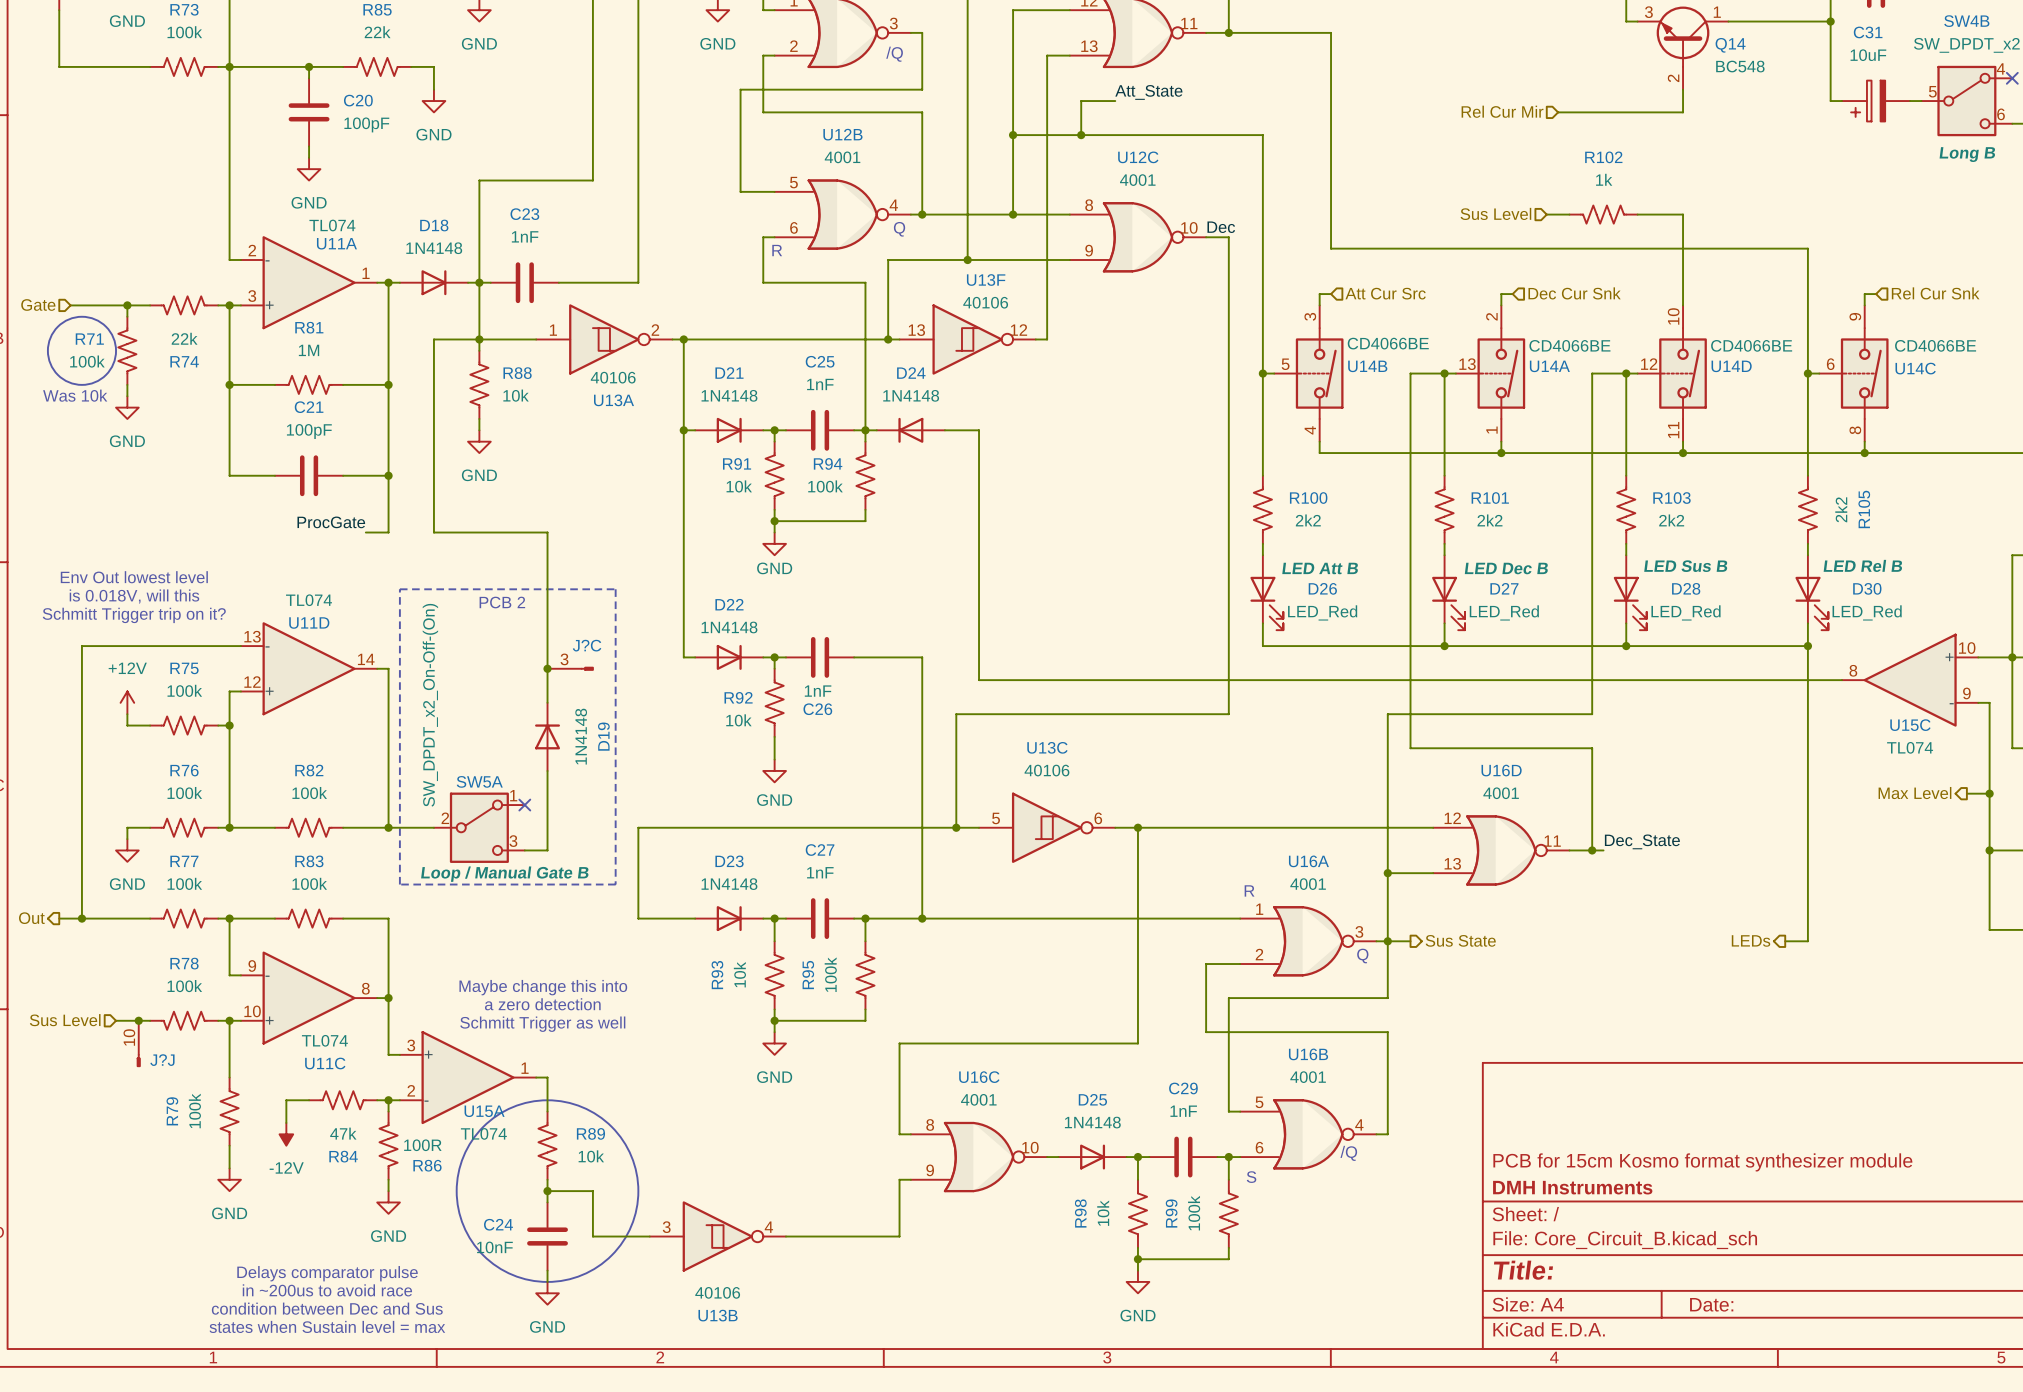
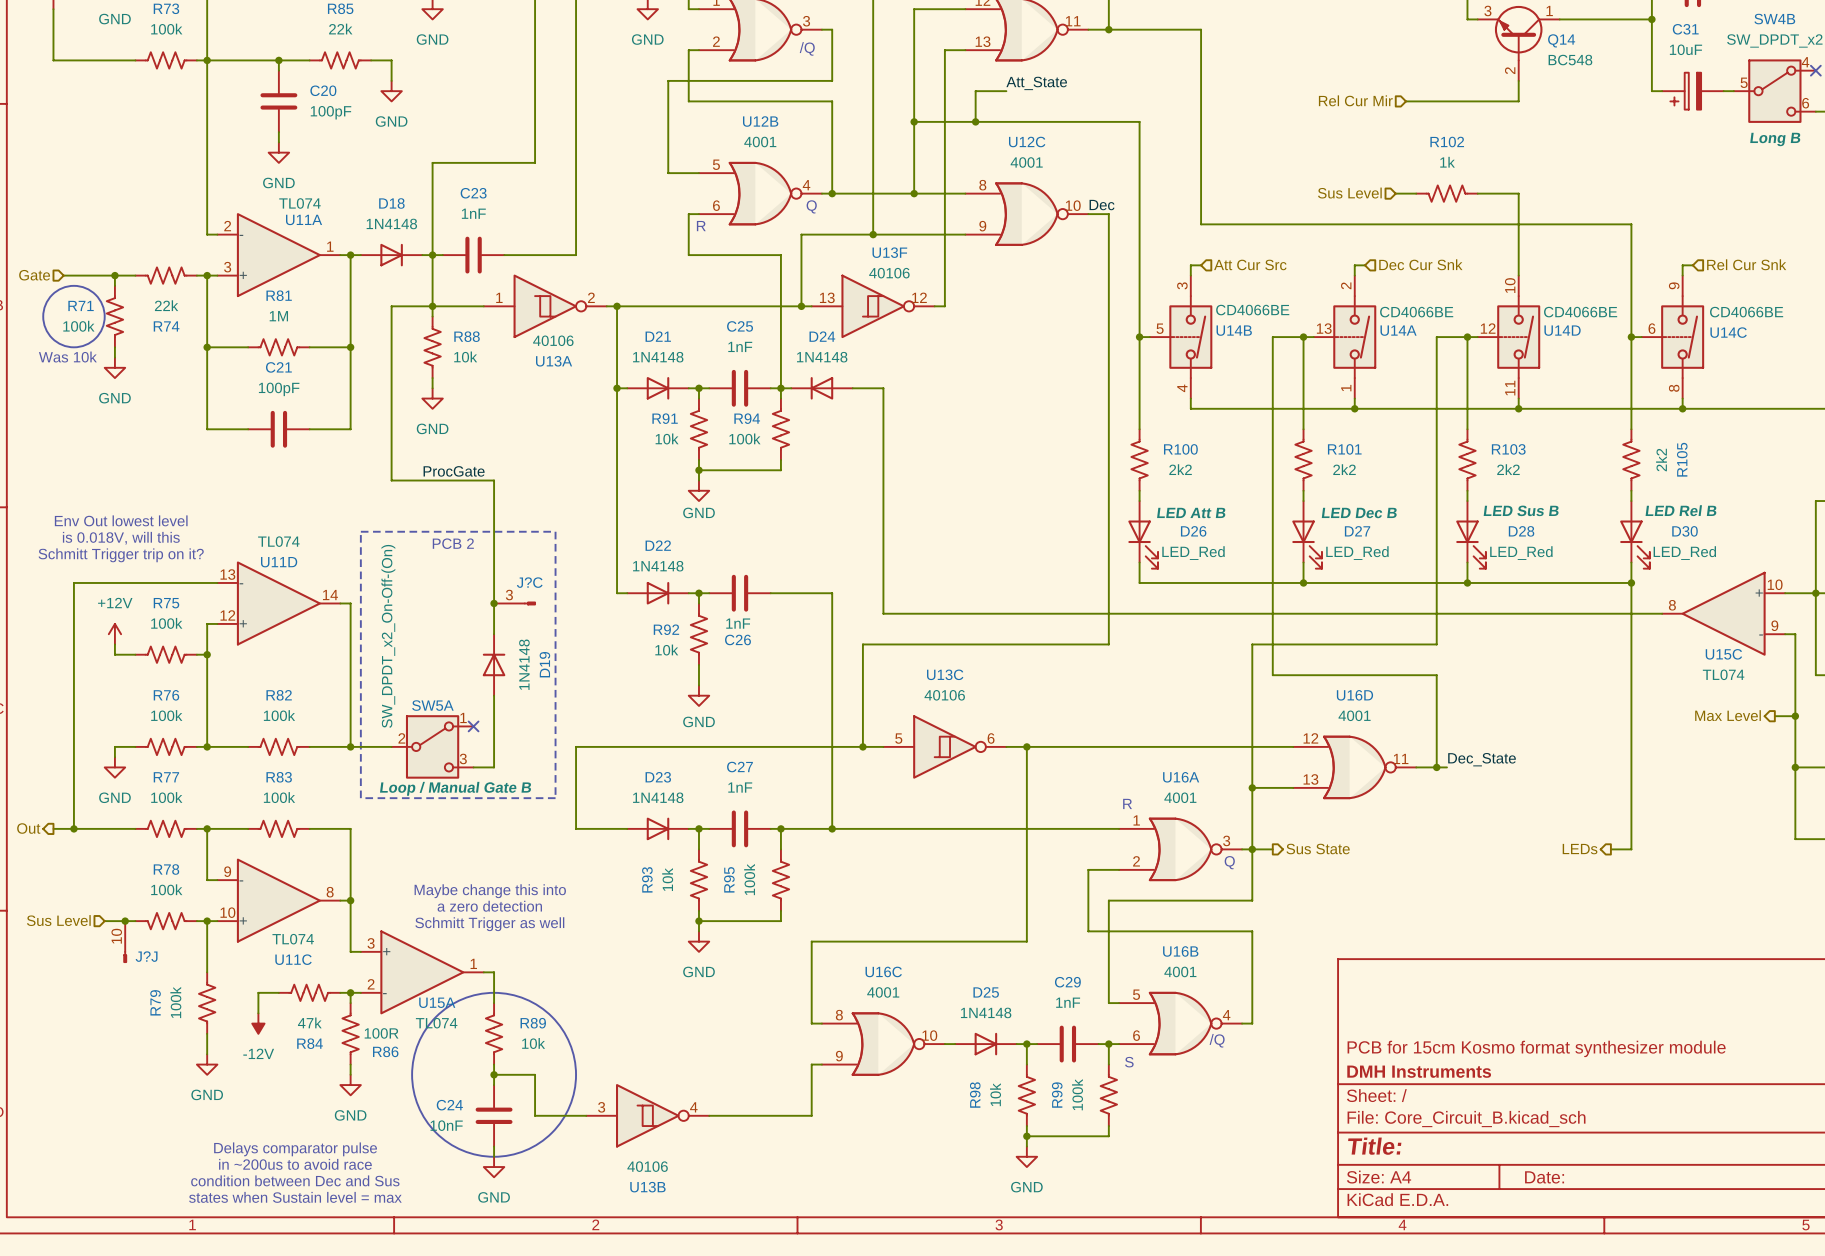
wire: (388, 475) (388, 532) (365, 532) -> none
junction: (388, 475) -> none
label position: ProcGate (331, 522) -> ProcGate (454, 471)

